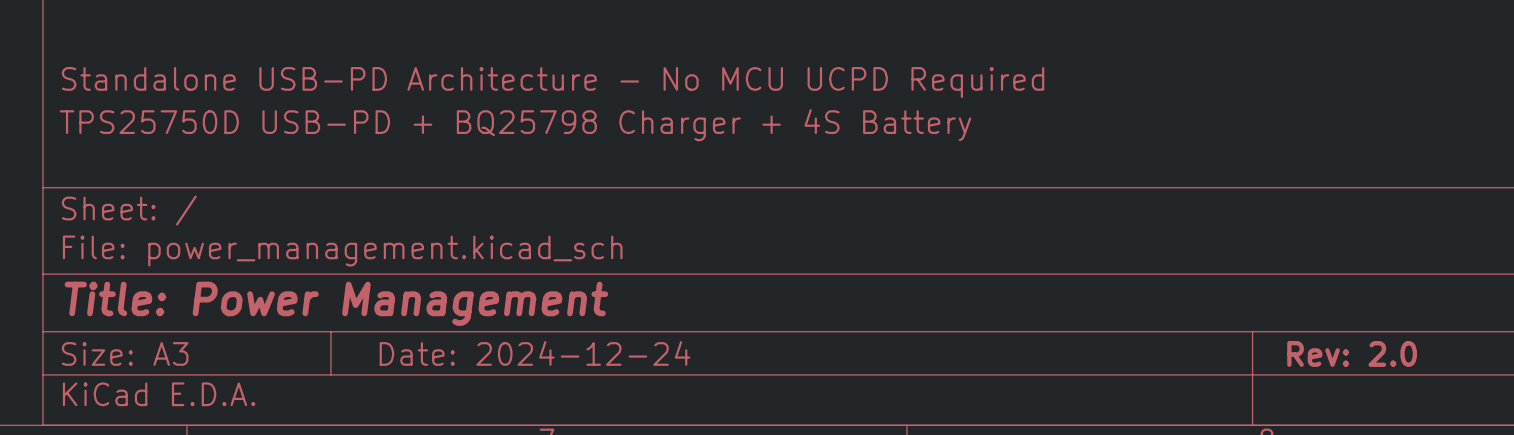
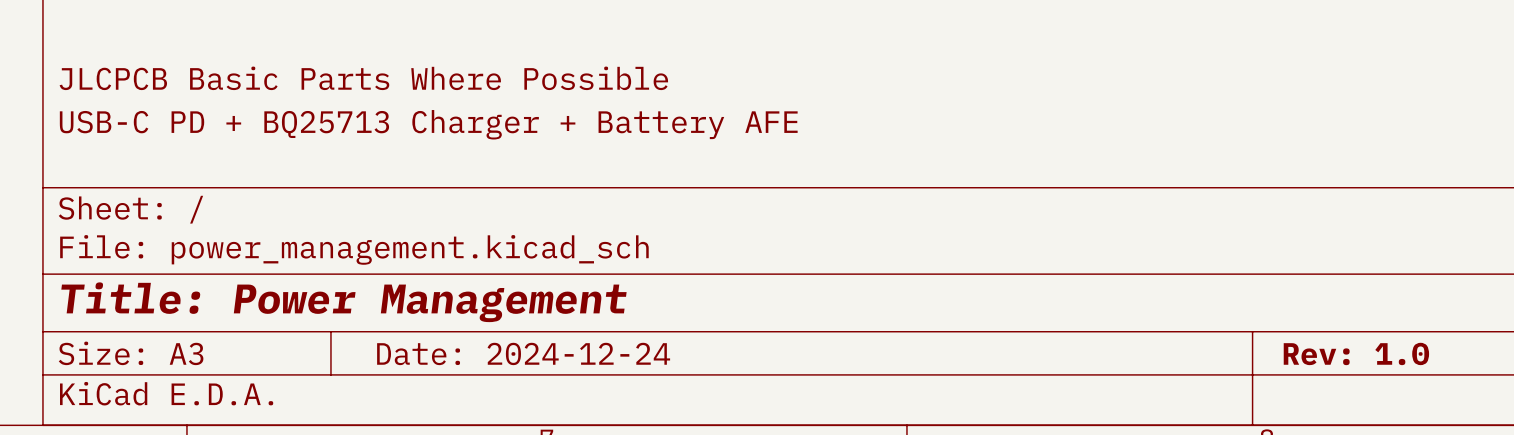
title block: Standalone USB-PD Architecture - No MCU UCPD Required (553, 82) -> JLCPCB Basic Parts Where Possible (363, 78)
title block: TPS25750D USB-PD + BQ25798 Charger + 4S Battery (515, 125) -> USB-C PD + BQ25713 Charger + Battery AFE (428, 124)
title block: Rev: 2.0 (1352, 353) -> Rev: 1.0 (1356, 353)

